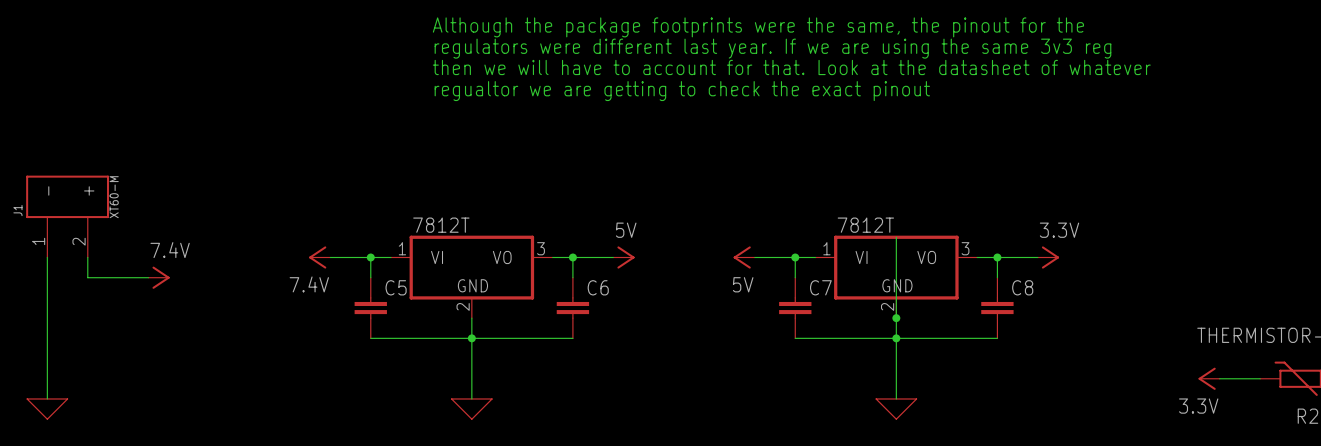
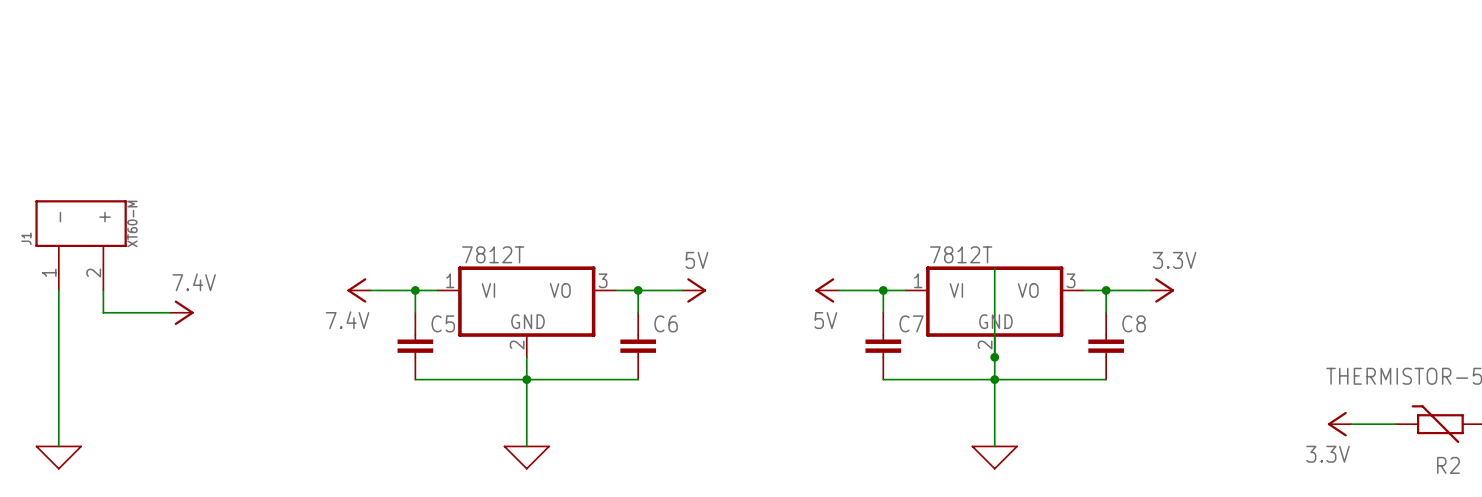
text: Although the package footprints were the same, the pinout for the (758, 27) -> none
text: regulators were different last year. If we are using the same 3v3 reg (772, 48) -> none
text: then we will have to account for that. Look at the datasheet of whatever (791, 67) -> none
text: regualtor we are getting to check the exact pinout (682, 91) -> none

